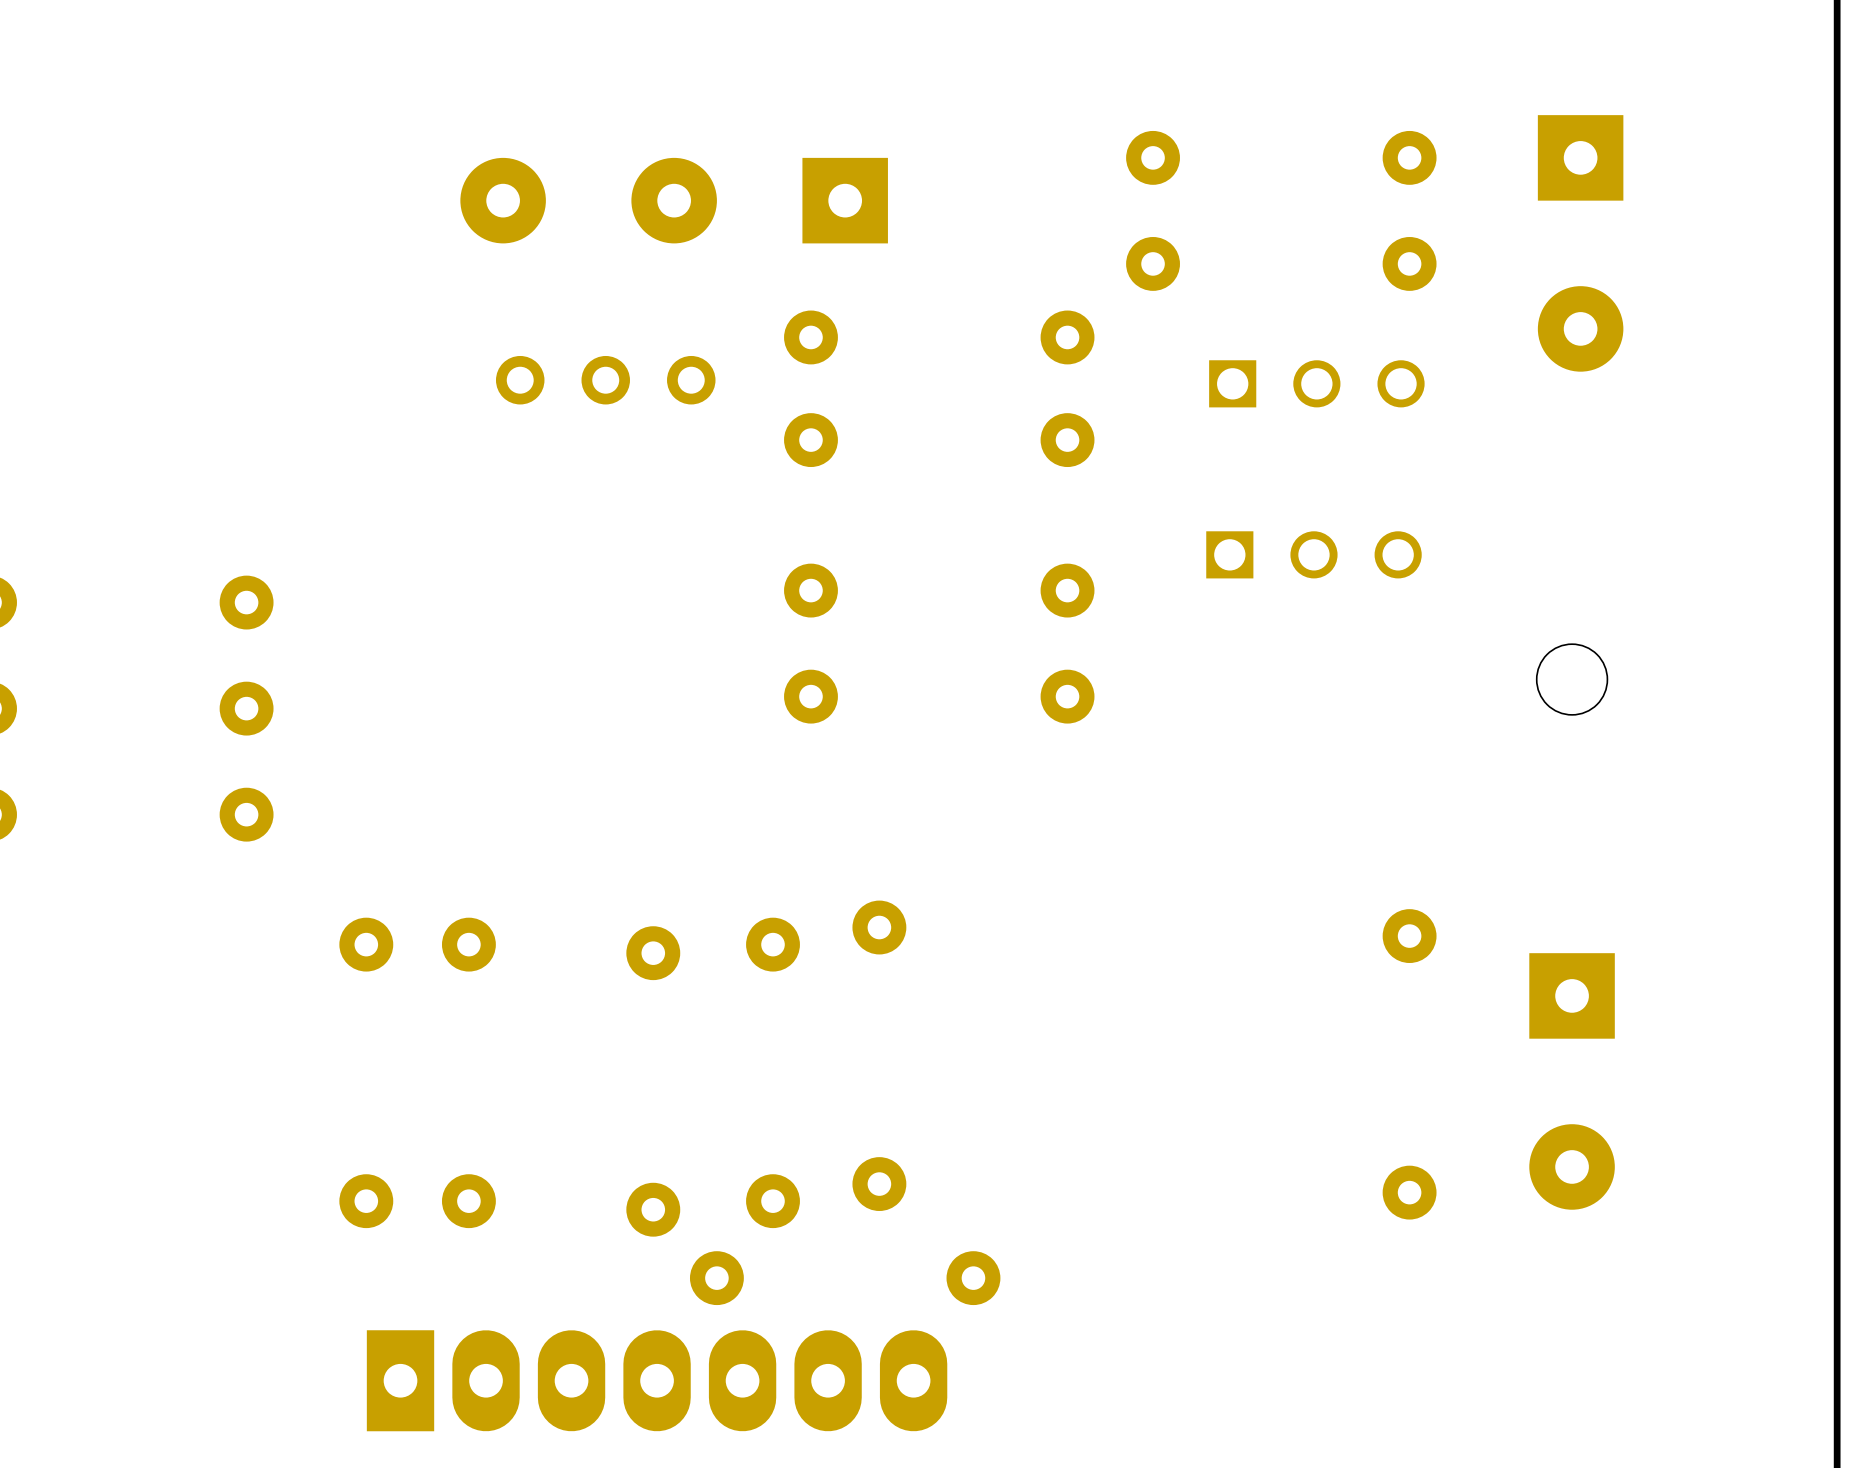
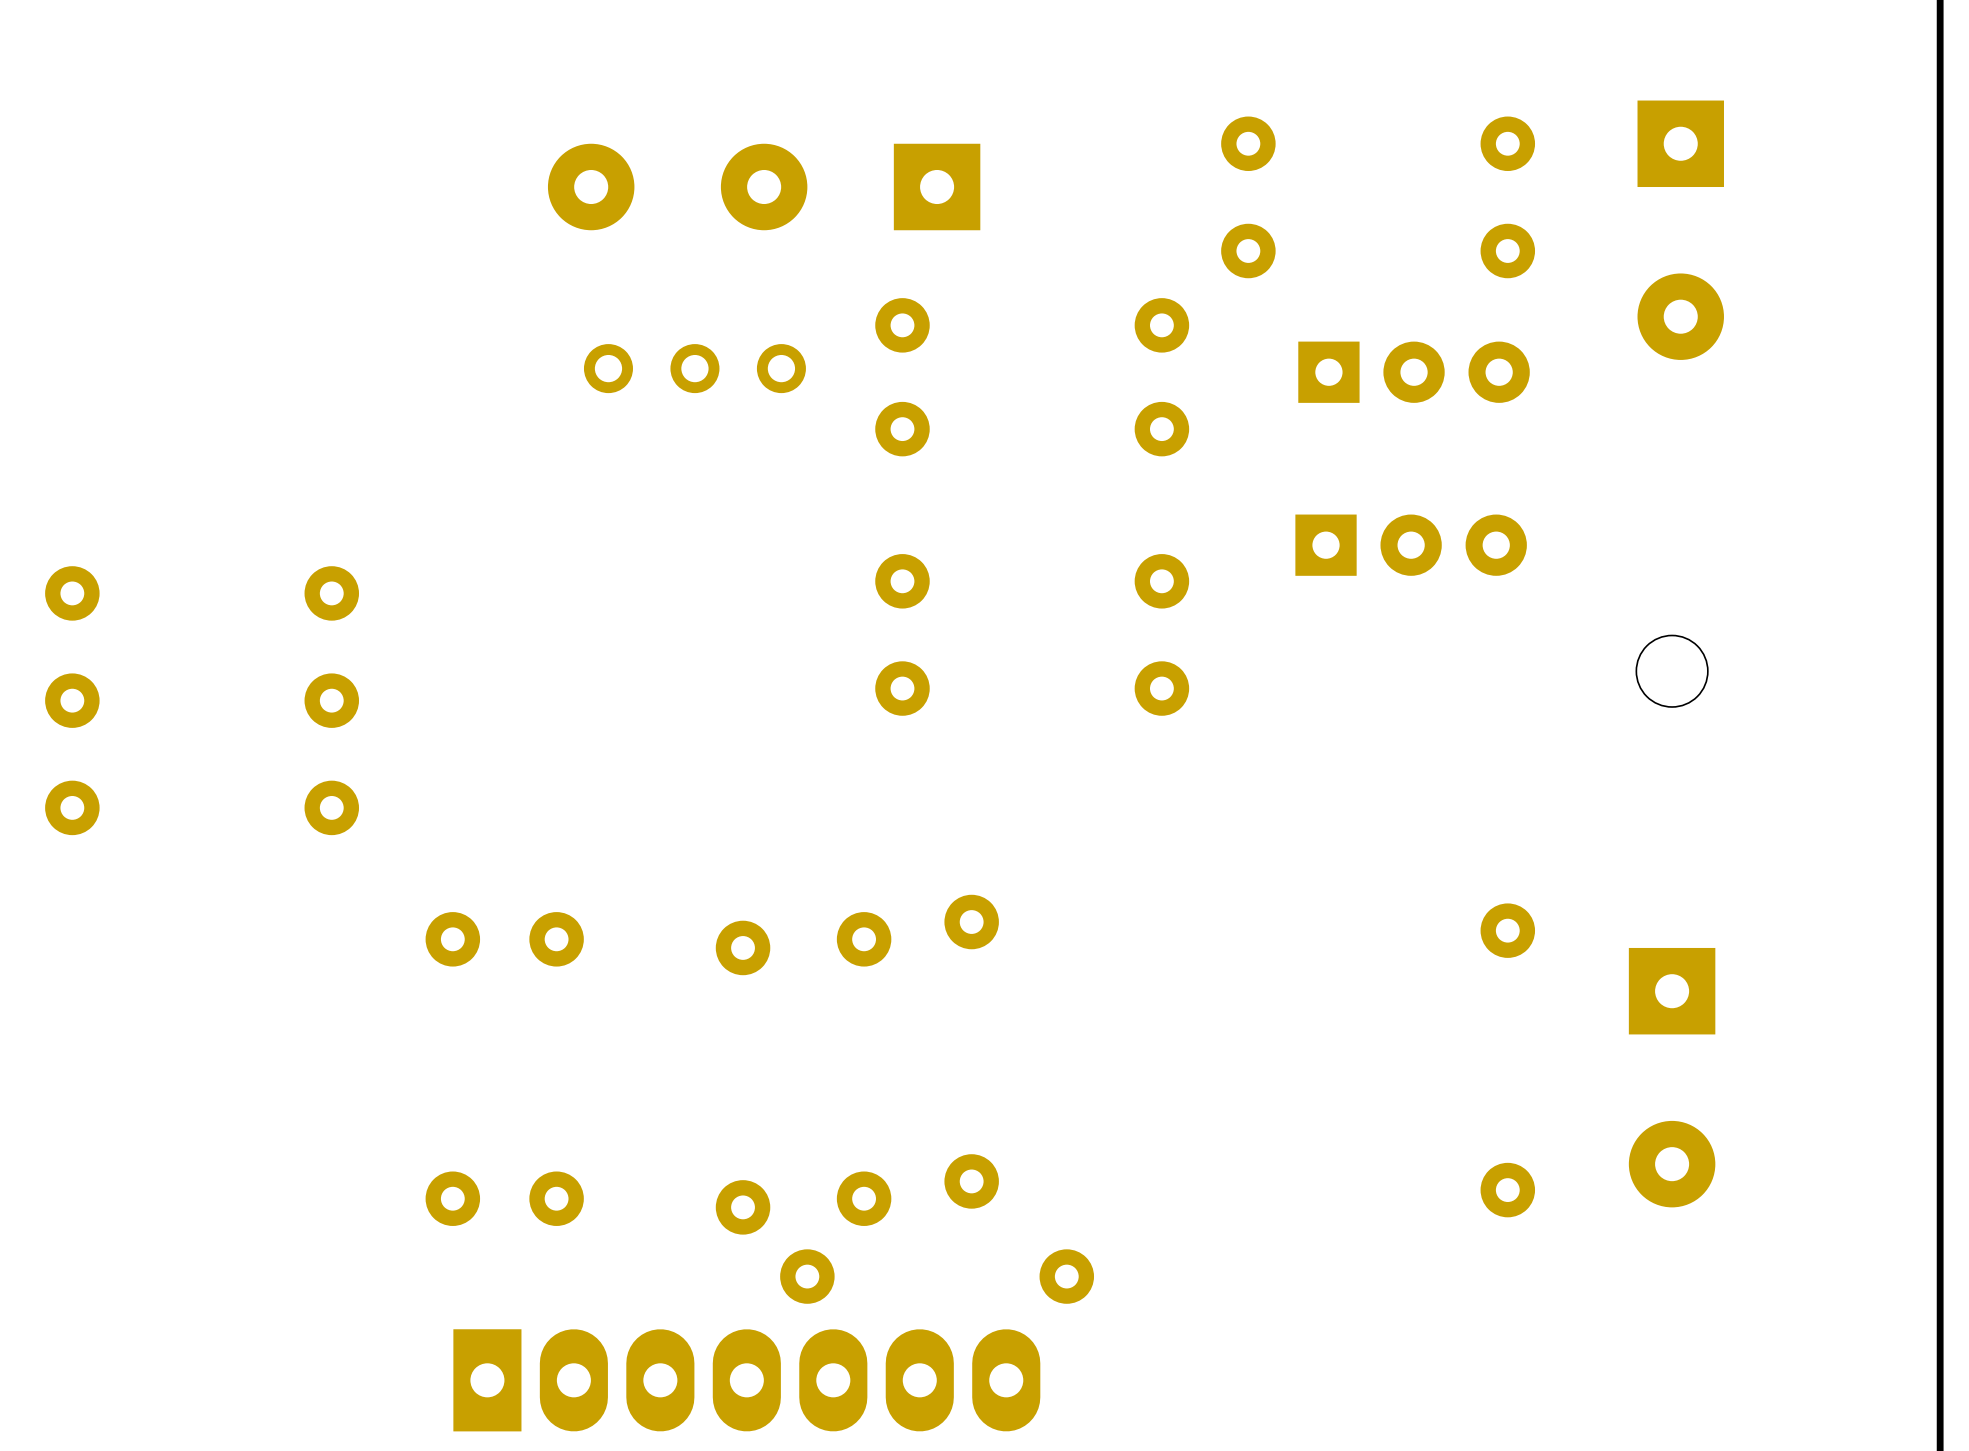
part footprint: [1209, 360, 1425, 408] -> [1298, 341, 1530, 403]
part footprint: [1206, 531, 1422, 579] -> [1295, 514, 1527, 576]

